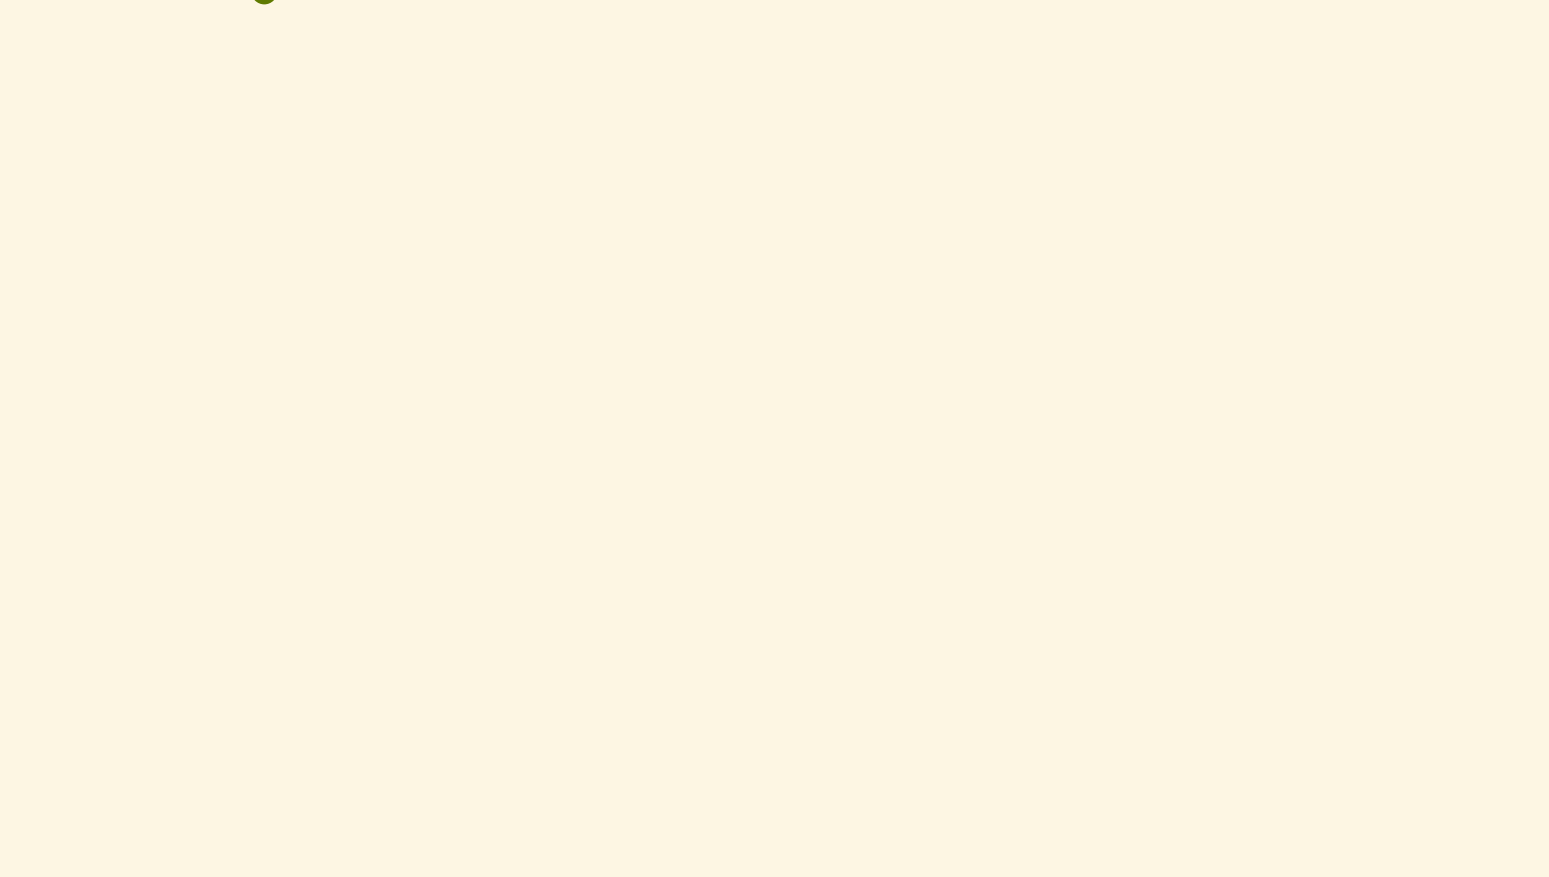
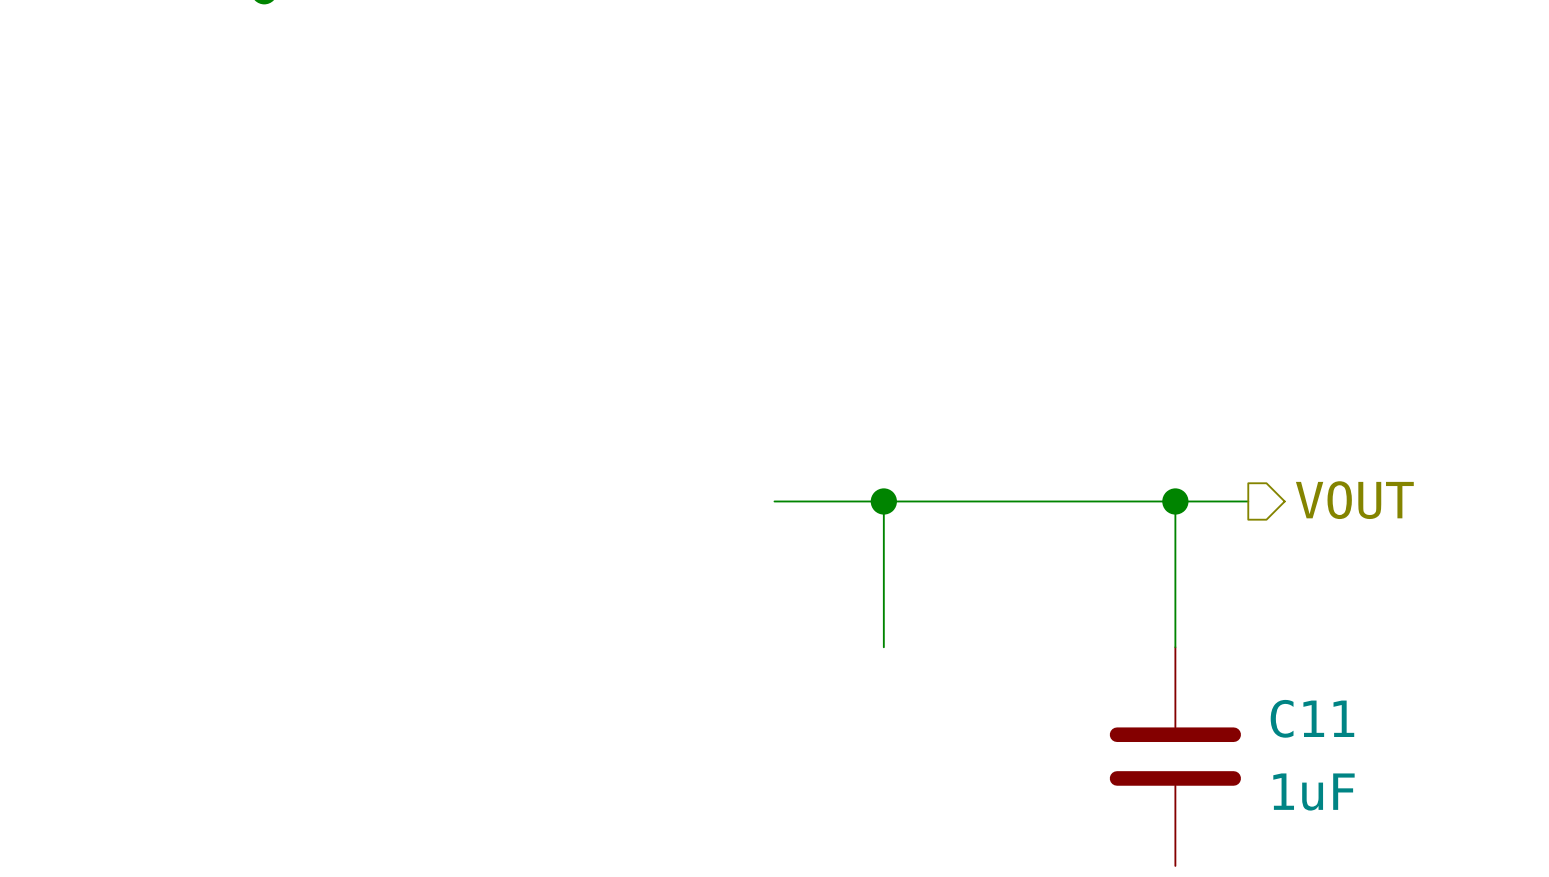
hierarchical label: none -> VOUT (1354, 500)
wire: none -> (774, 501) (1248, 501)
wire: none -> (883, 501) (883, 647)
junction: none -> (883, 501)
wire: none -> (1175, 501) (1175, 647)
junction: none -> (1175, 501)
C11: none -> 1uF (1175, 756)

